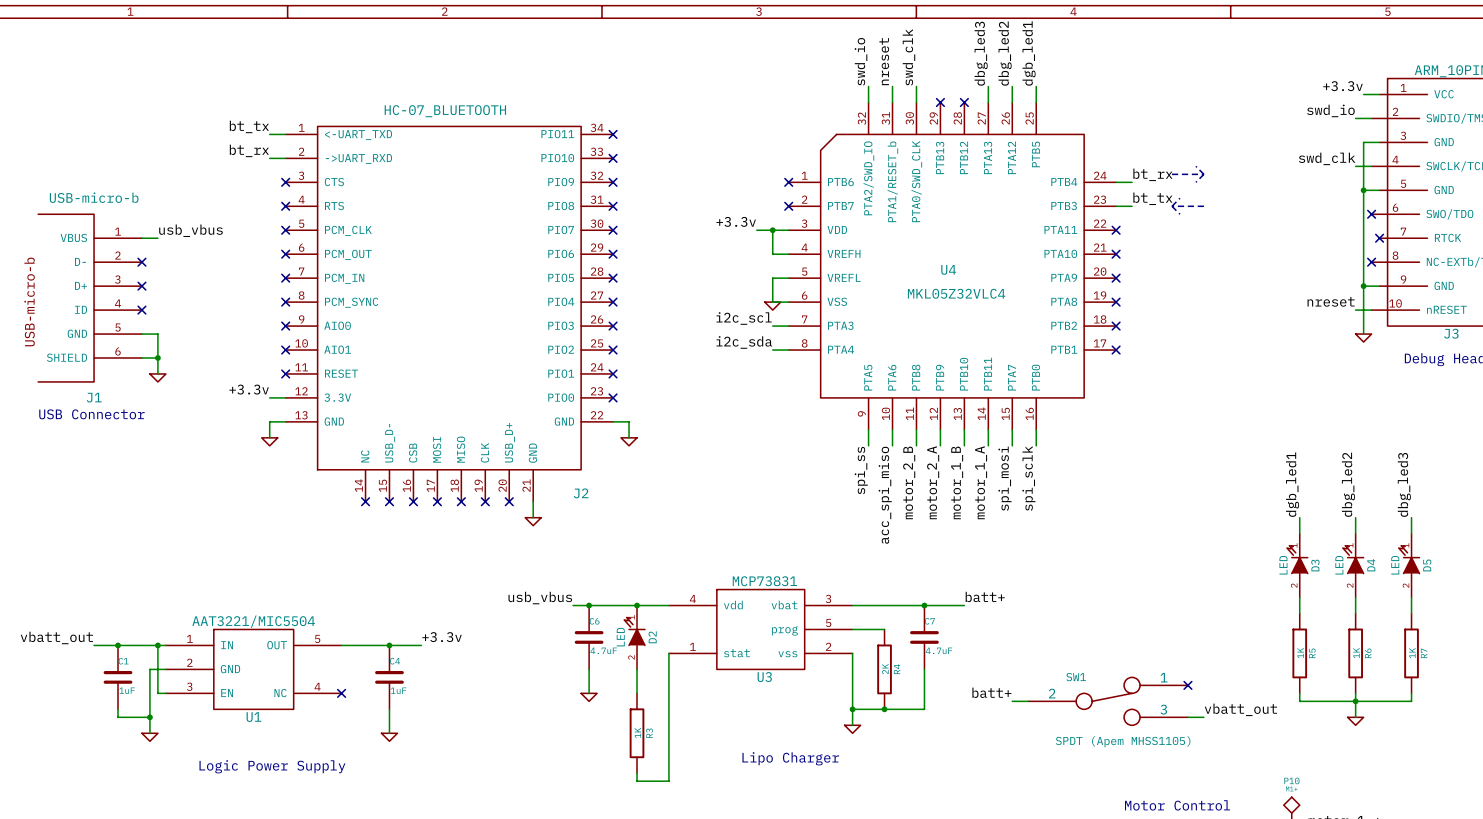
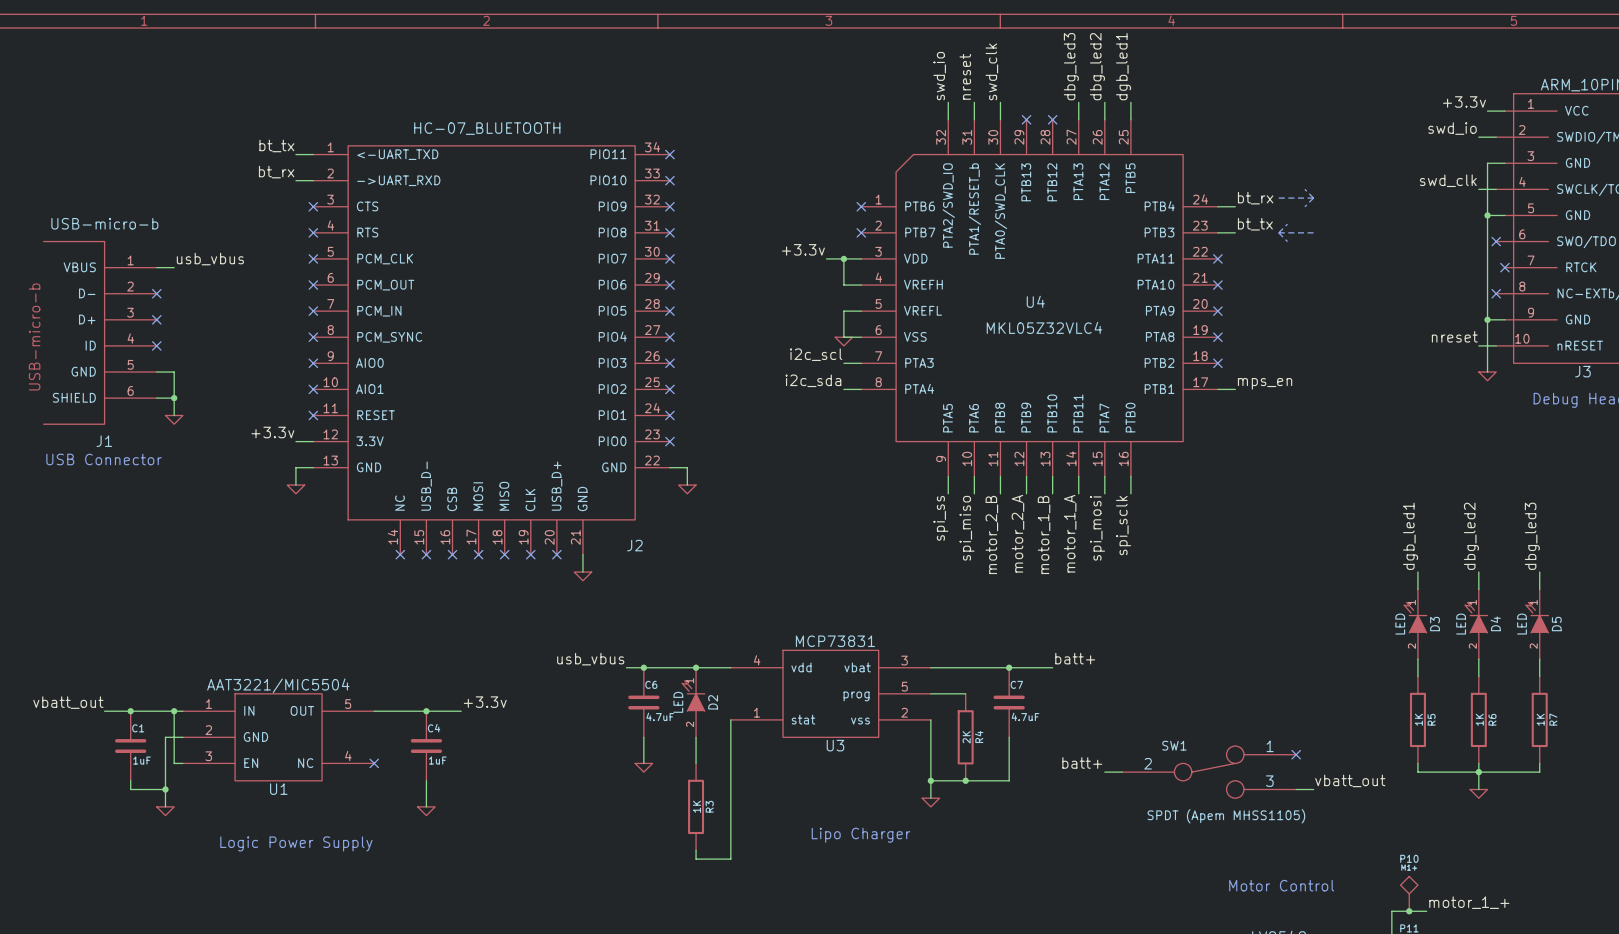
label: none -> mps_en (1265, 383)
wire: none -> (1217, 389) (1235, 389)
no-connect mark: (1116, 350) -> none
label: acc_spi_miso (885, 495) -> spi_miso (967, 528)

